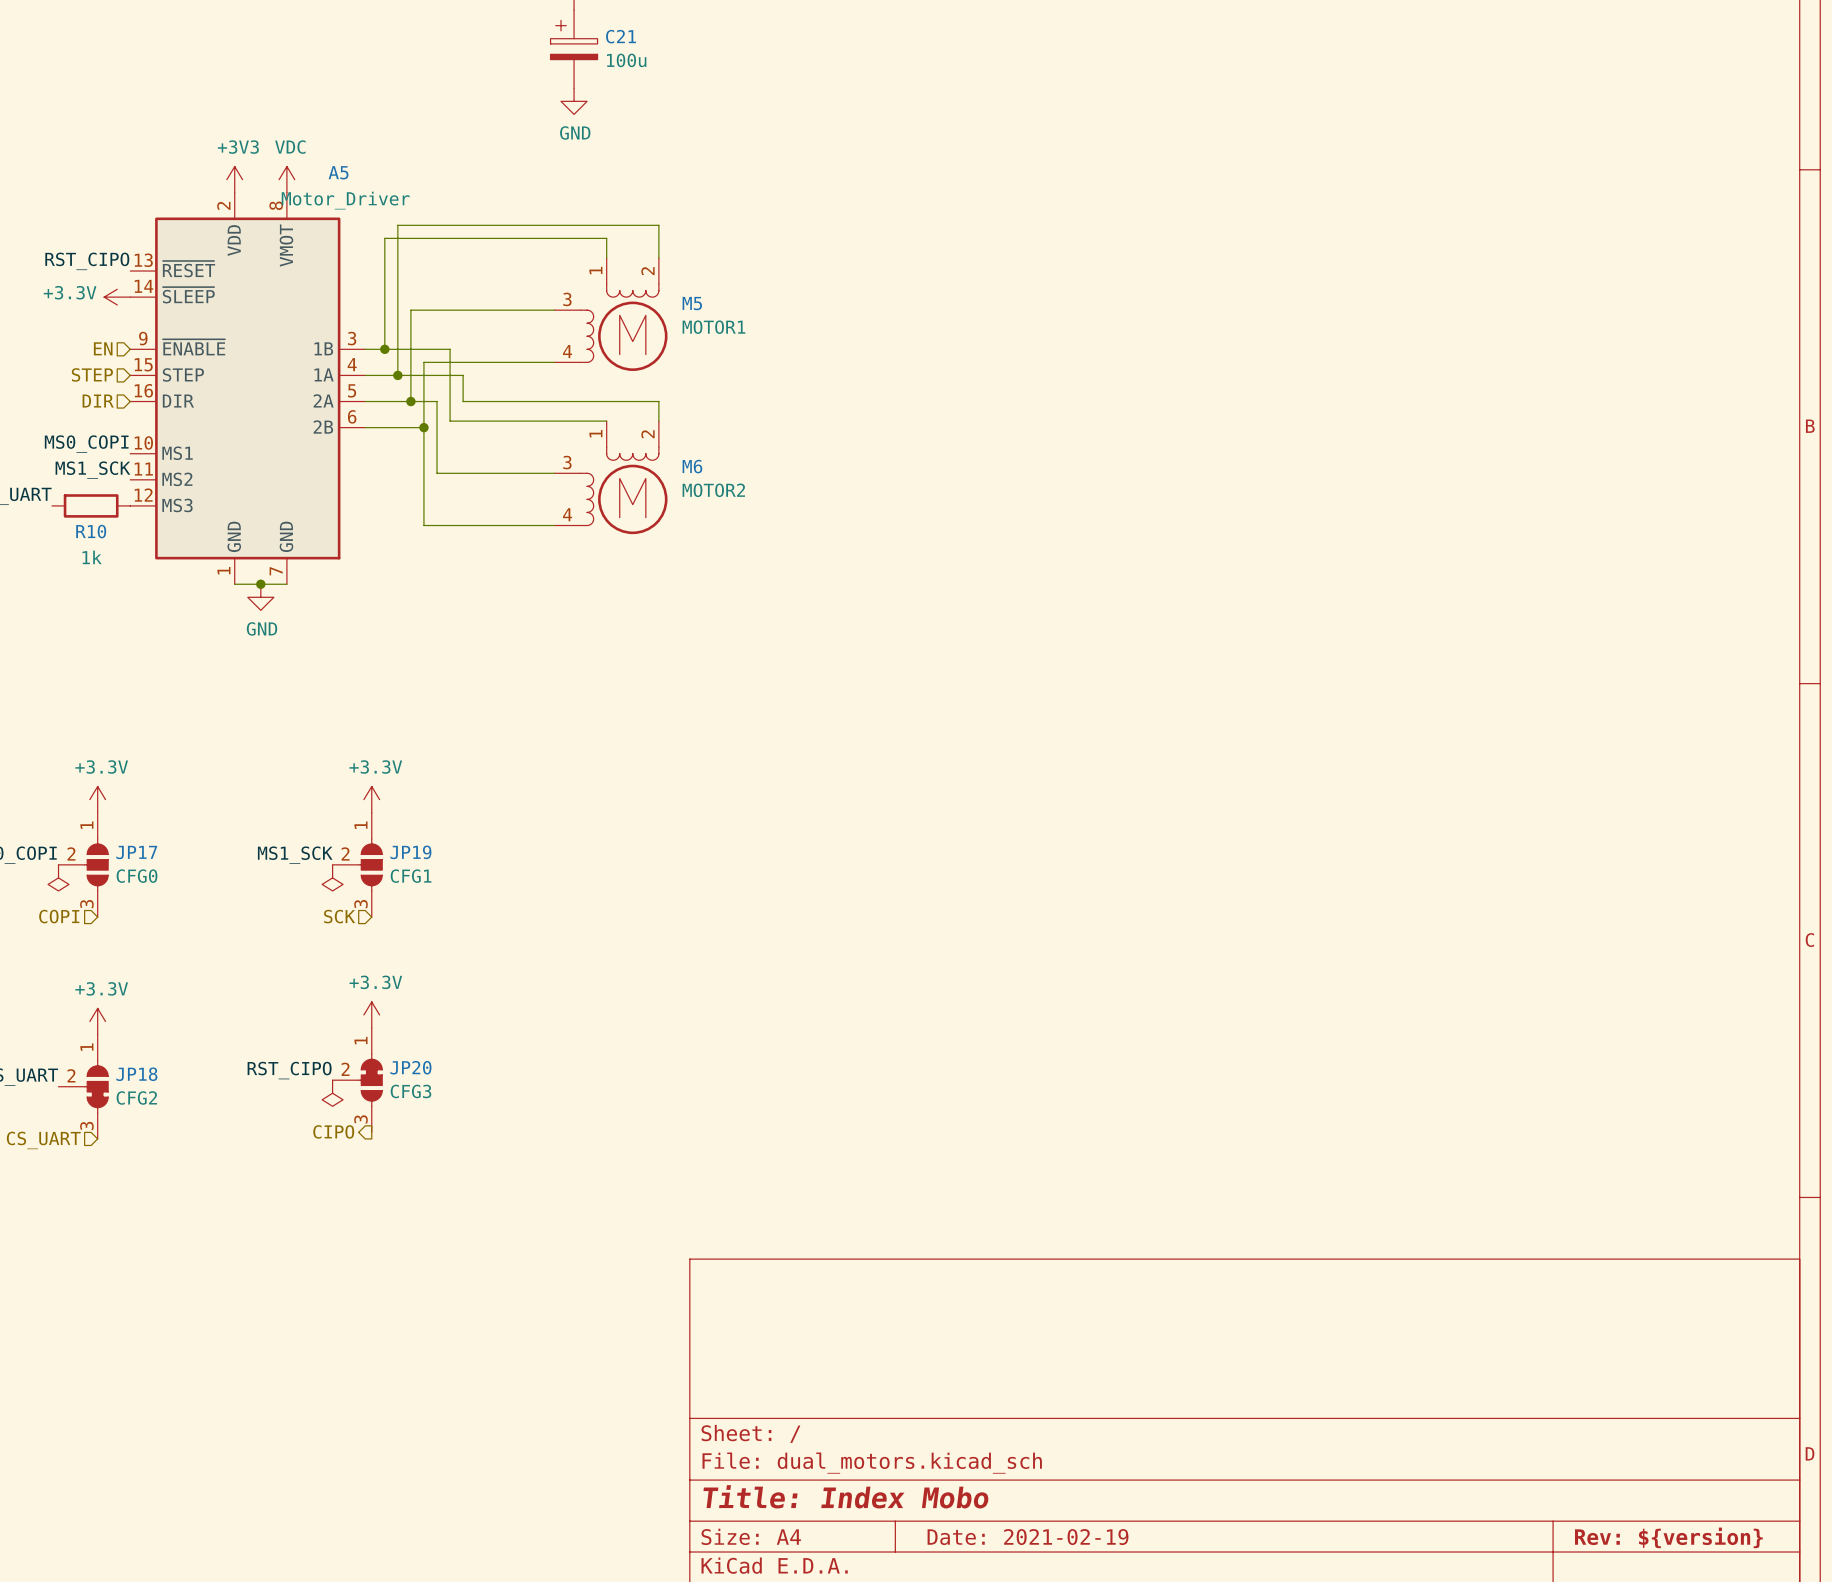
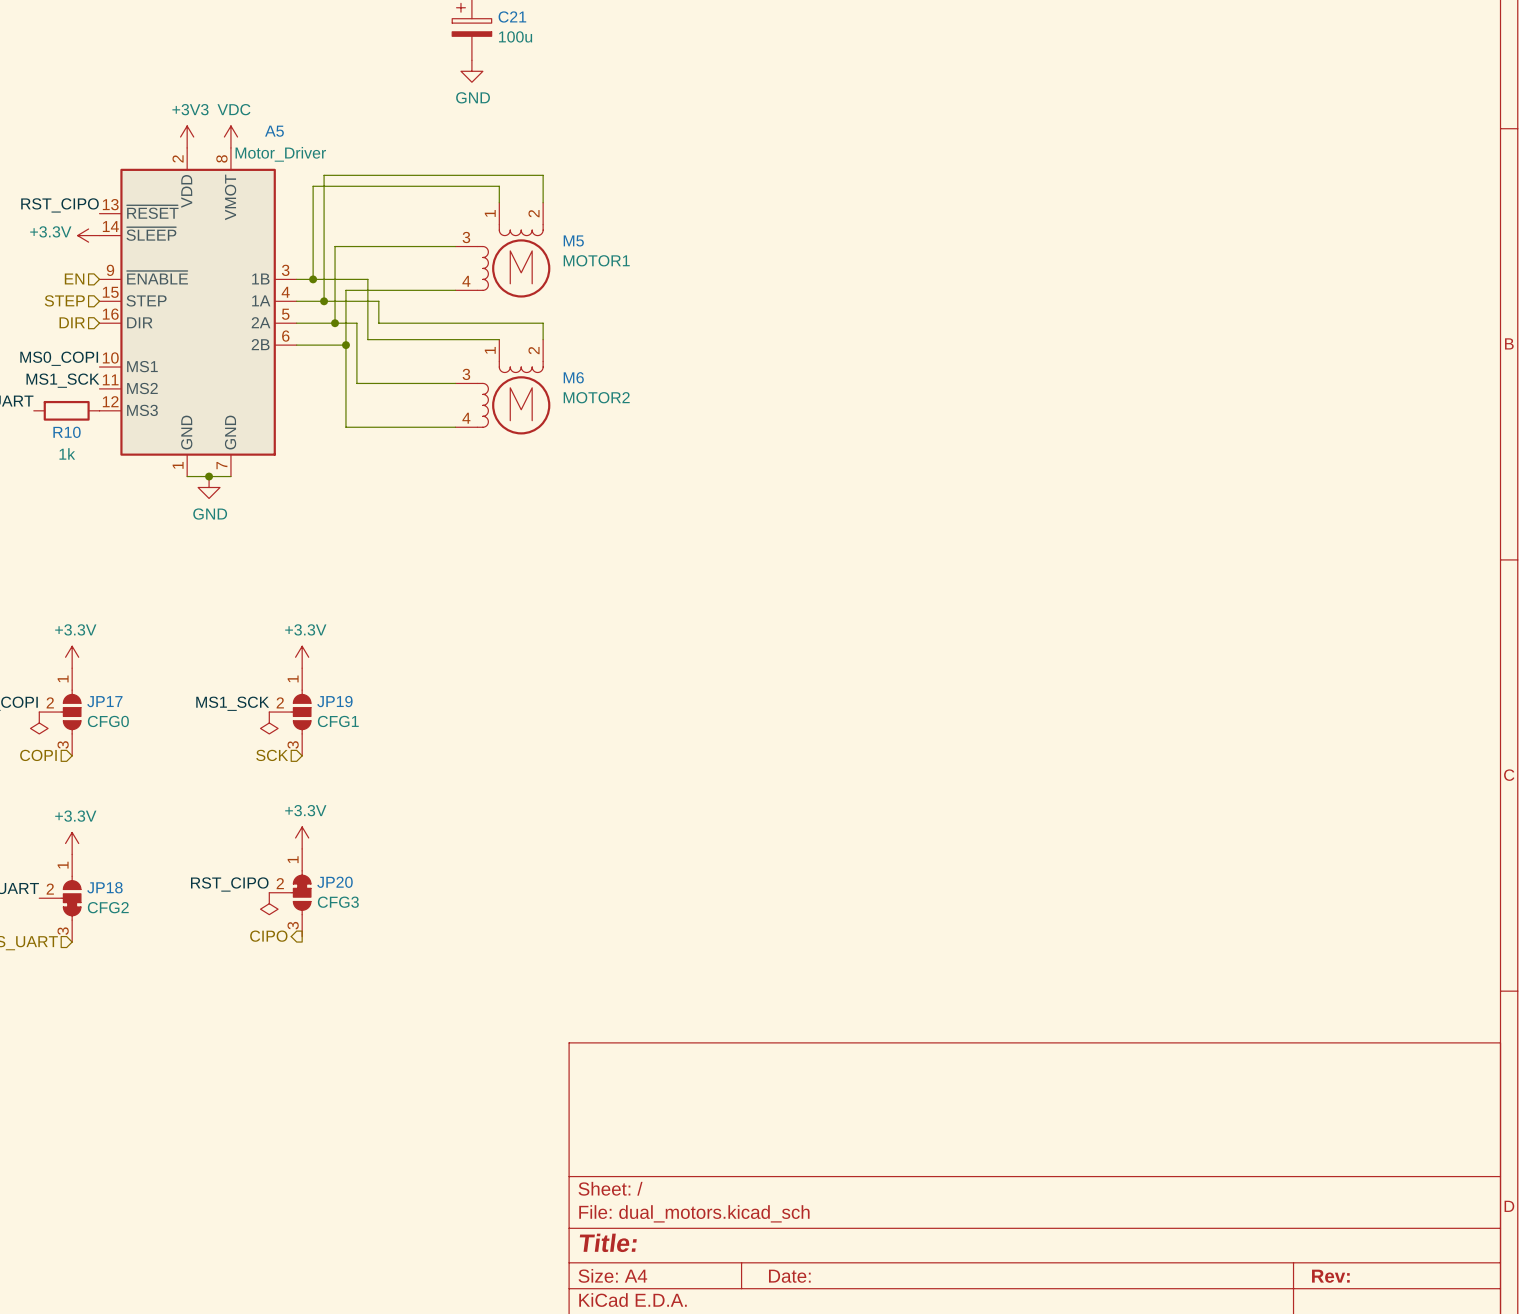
title block: Title: Index Mobo (846, 1496) -> Title: (608, 1242)
title block: Date: 2021-02-19 (1028, 1537) -> Date: (789, 1276)
title block: Rev: ${version} (1668, 1537) -> Rev: (1330, 1276)

